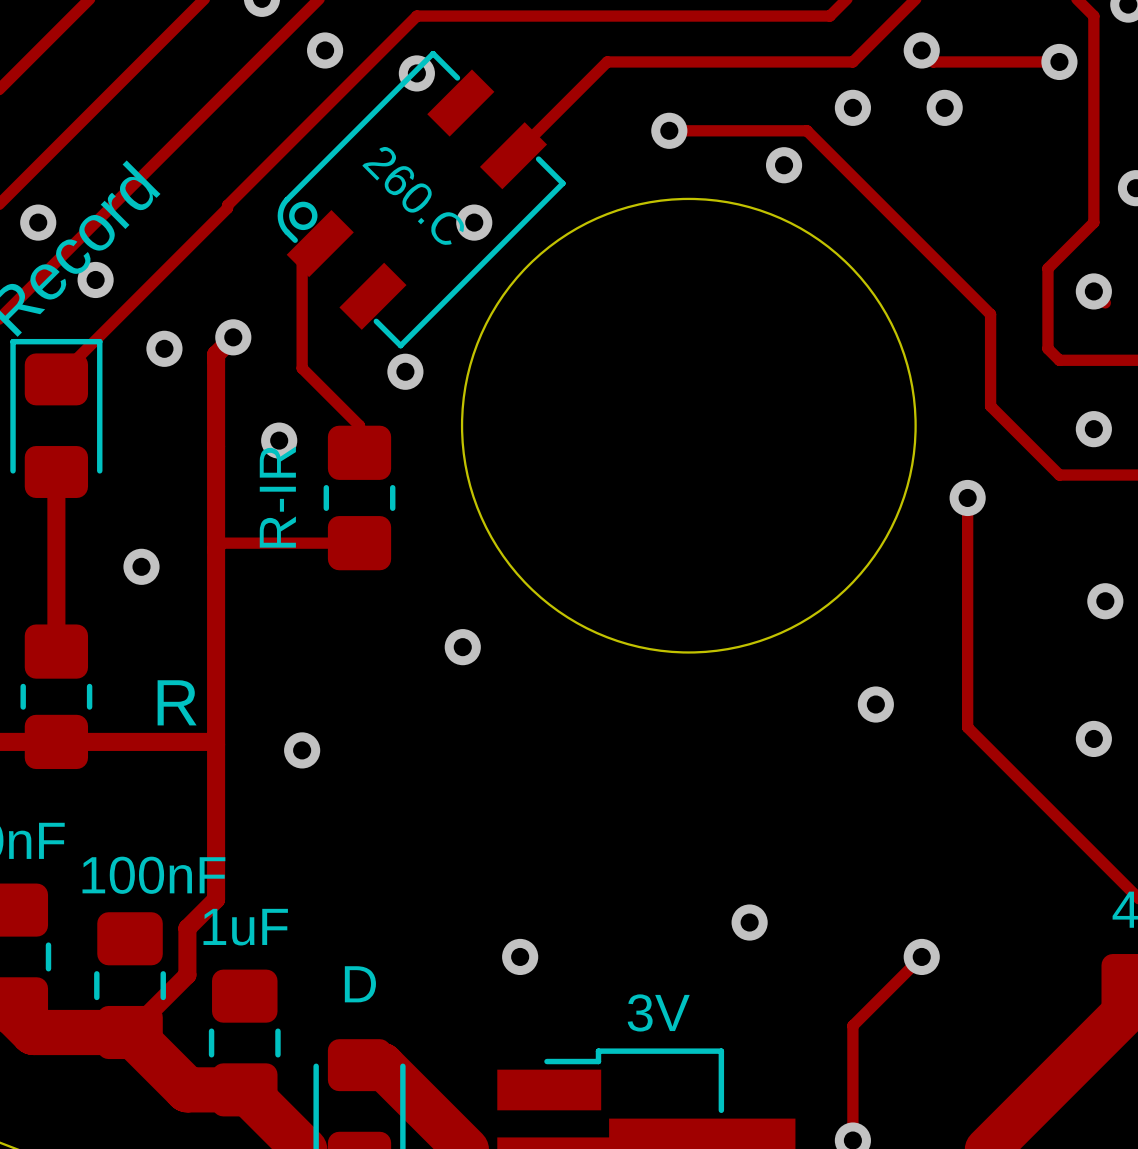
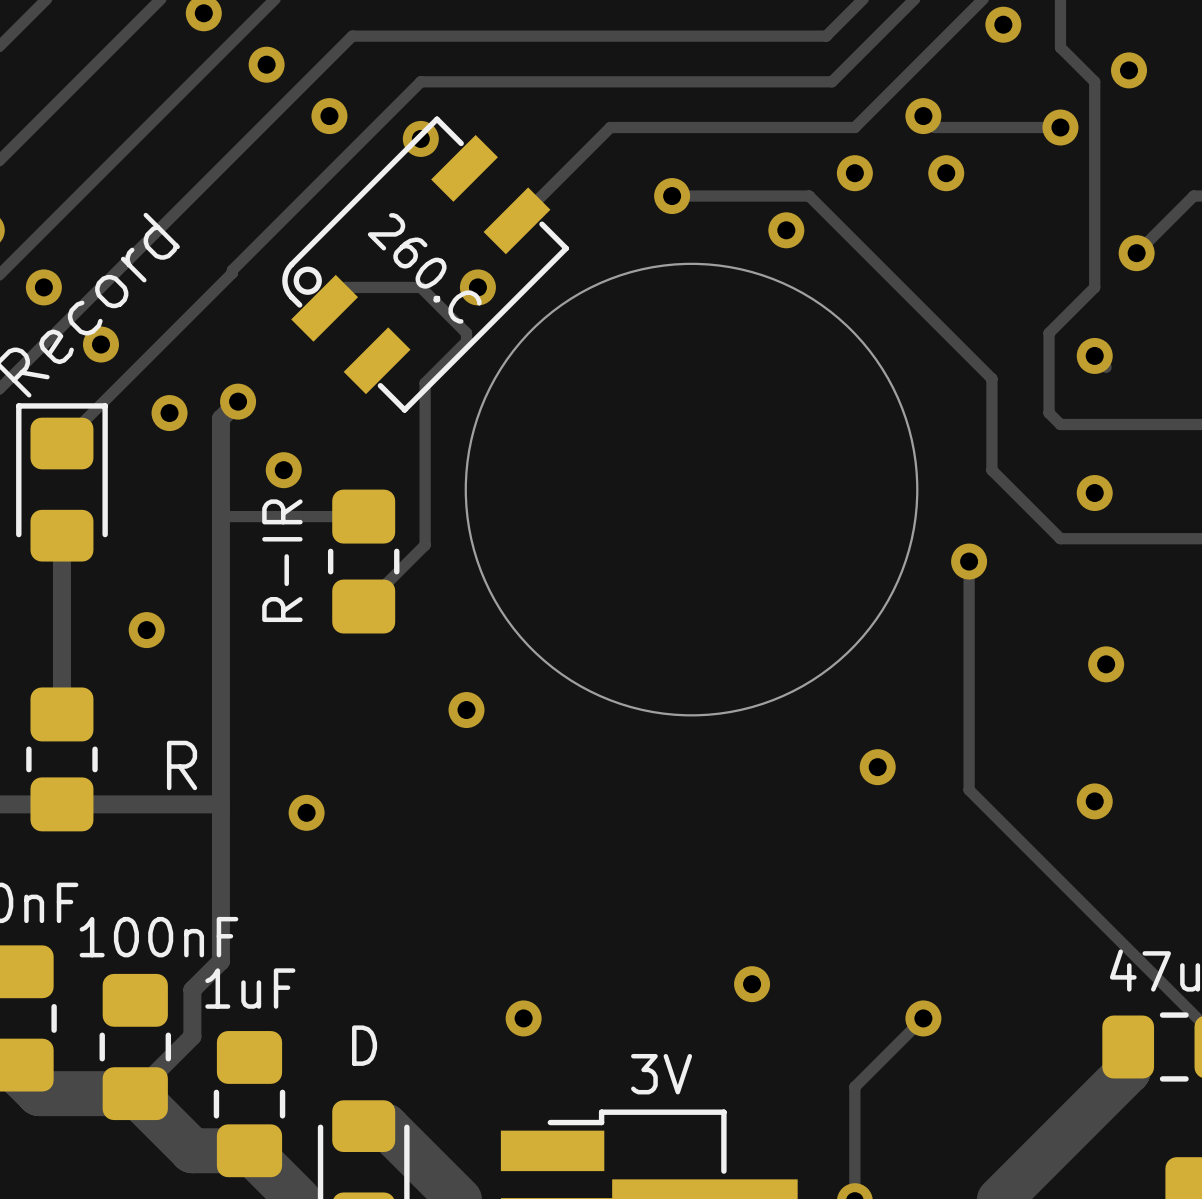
track: (320, 243) (302, 261) (302, 368) (359, 425) (359, 452) -> (324, 308) (345, 287) (420, 287) (466, 333) (466, 341) (425, 383) (425, 545) (363, 606)
via: (405, 371) -> none
via position: (279, 440) -> (283, 470)
track: none -> (220, 510) (227, 516) (363, 516)
track: (359, 543) (222, 543) (216, 549) -> none

